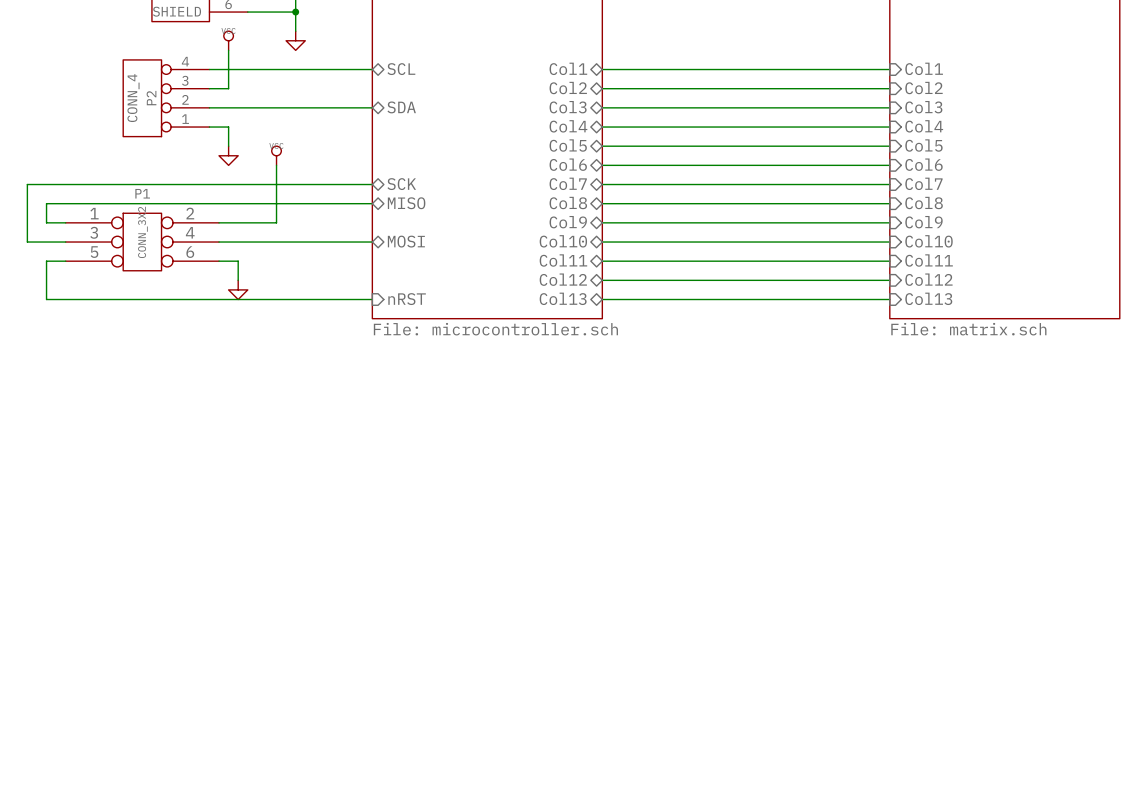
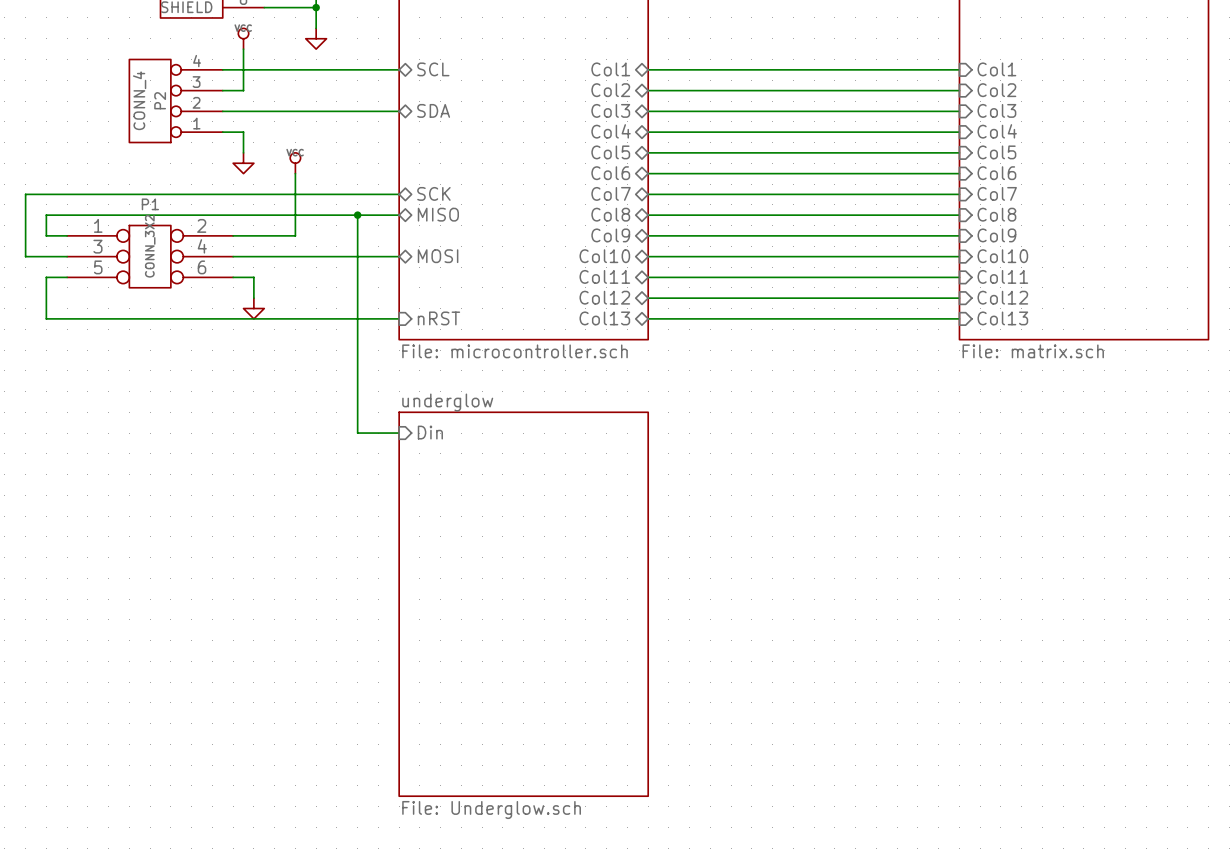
wire: none -> (357, 215) (357, 433) (399, 433)
junction: none -> (357, 215)
sheet pin: none -> Din (430, 432)
sheet underglow: none -> File: Underglow.sch (523, 604)

